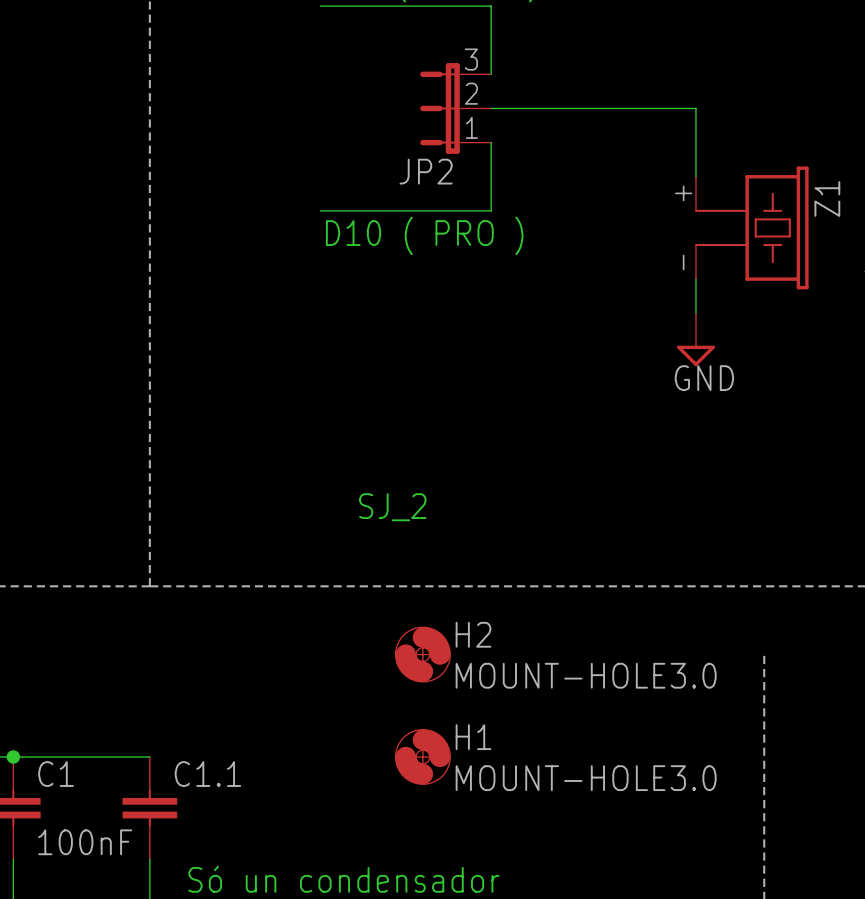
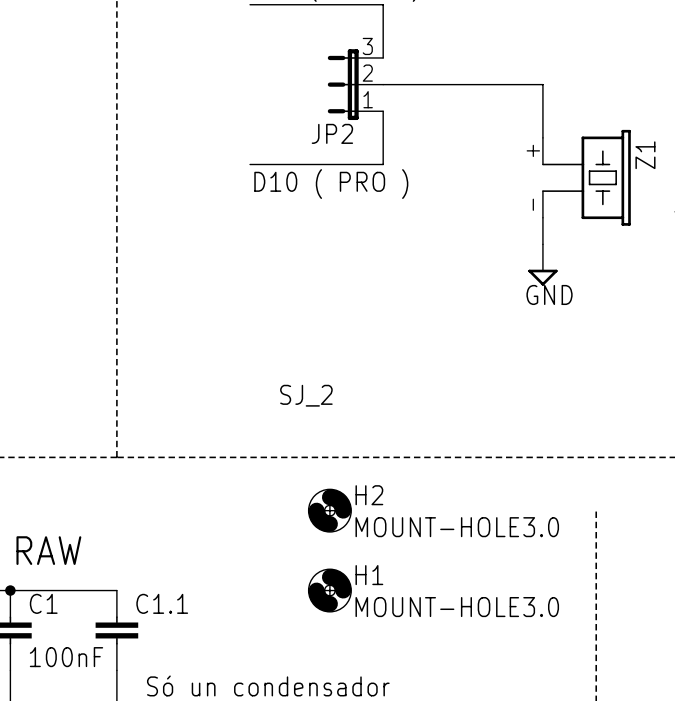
label: none -> RAW (48, 550)

